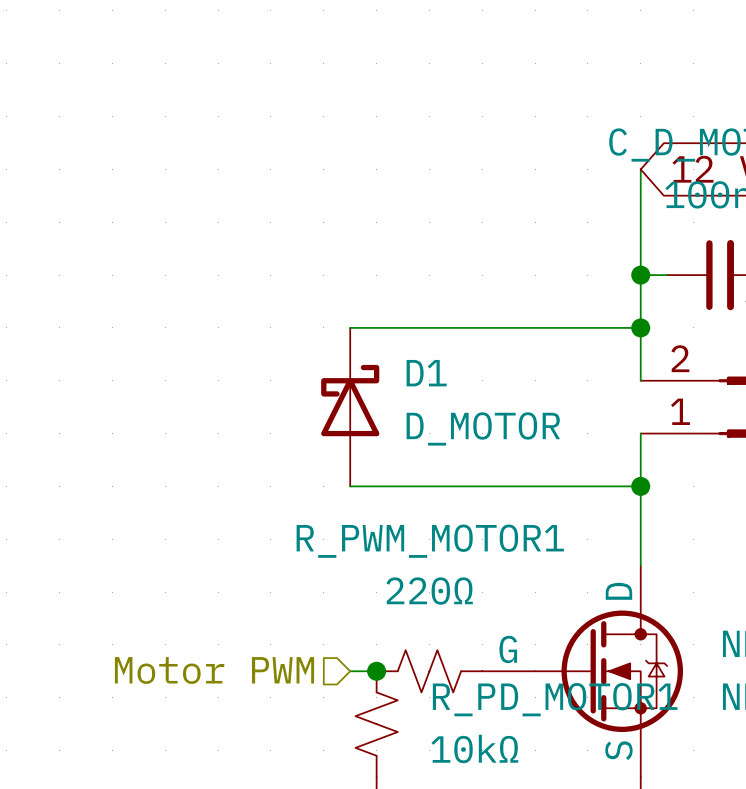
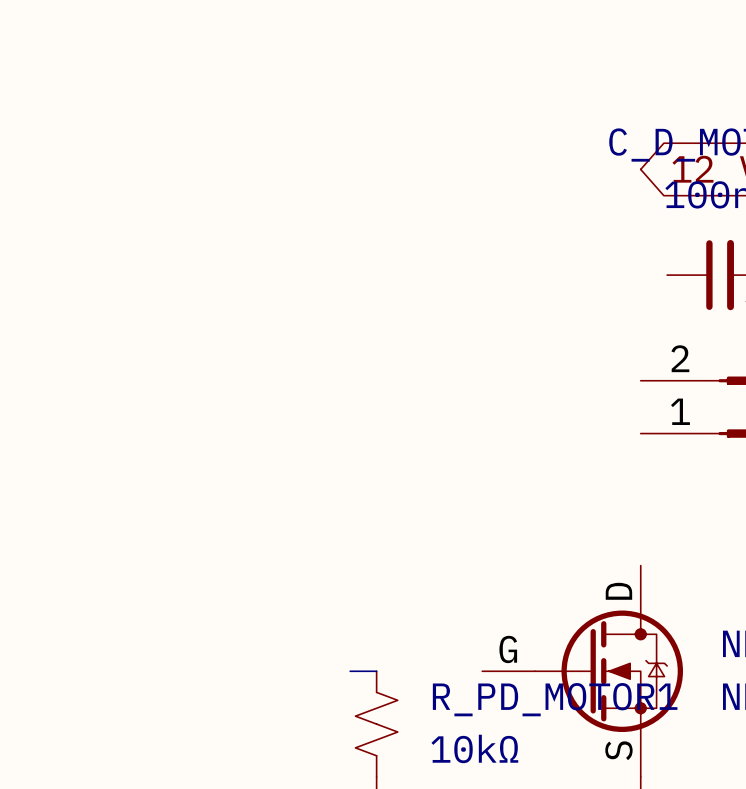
wire: (640, 169) (640, 380) -> none
wire: (640, 275) (667, 275) -> none
junction: (640, 275) -> none
wire: (350, 327) (640, 327) -> none
junction: (640, 327) -> none
D1: D_MOTOR (350, 407) -> none
wire: (640, 433) (640, 565) -> none
wire: (350, 486) (640, 486) -> none
junction: (640, 486) -> none
hierarchical label: Motor PWM (214, 670) -> none
junction: (376, 671) -> none
R_PWM_MOTOR1: 220Ω (429, 671) -> none

